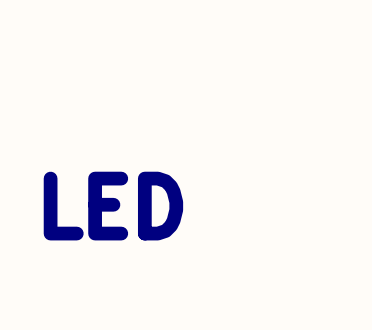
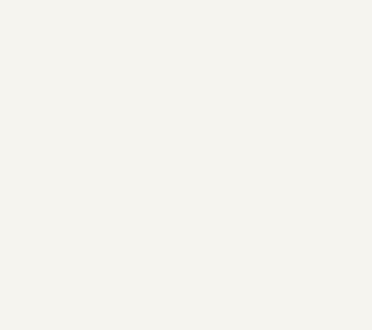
text: LED (113, 206) -> none

